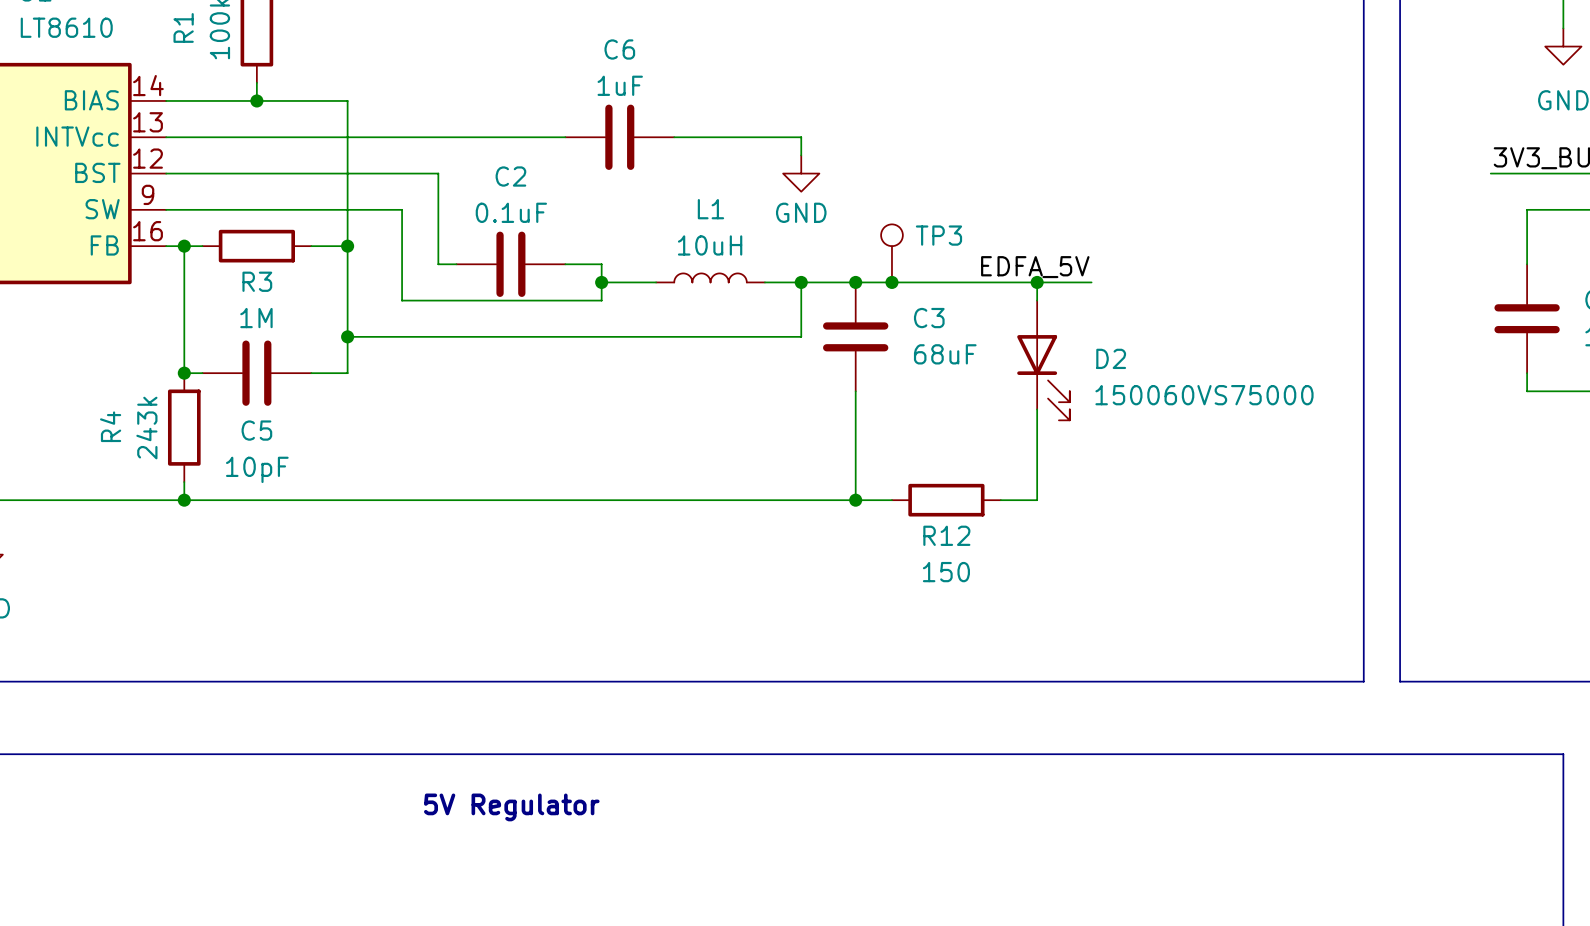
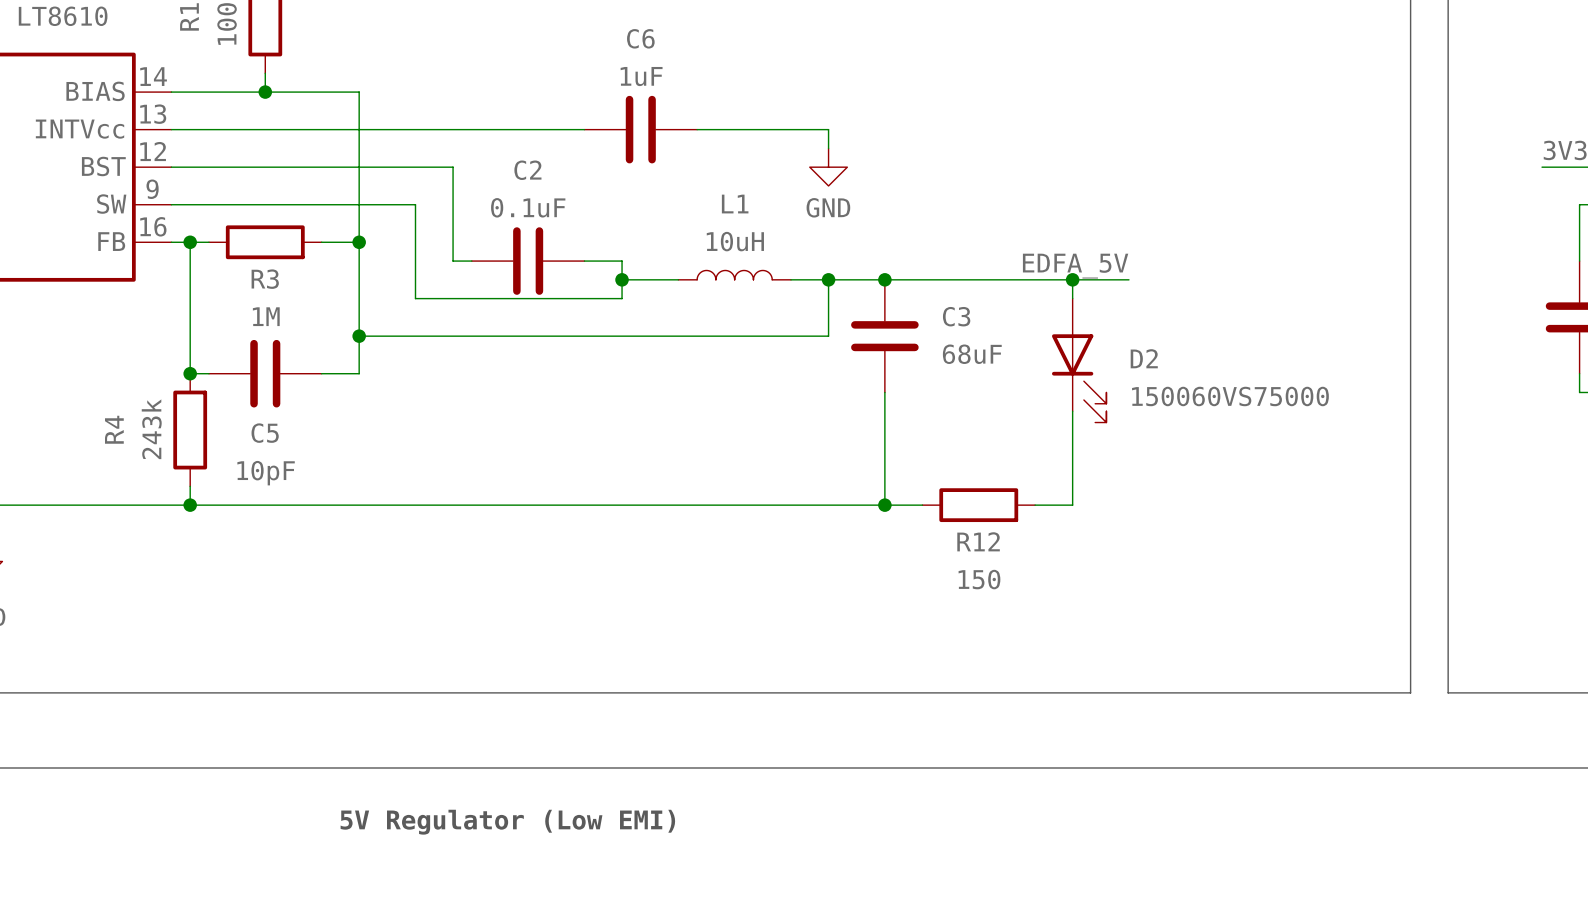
TP3: (891, 253) -> none
junction: (891, 282) -> none
text: 5V Regulator (511, 807) -> 5V Regulator (Low EMI) (507, 822)

